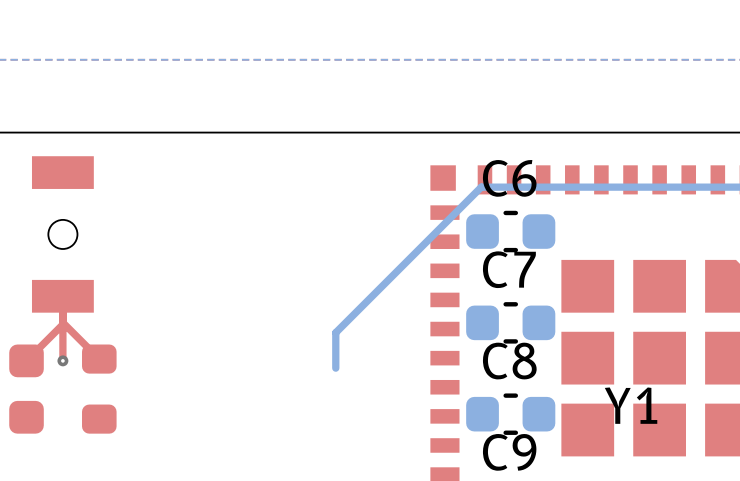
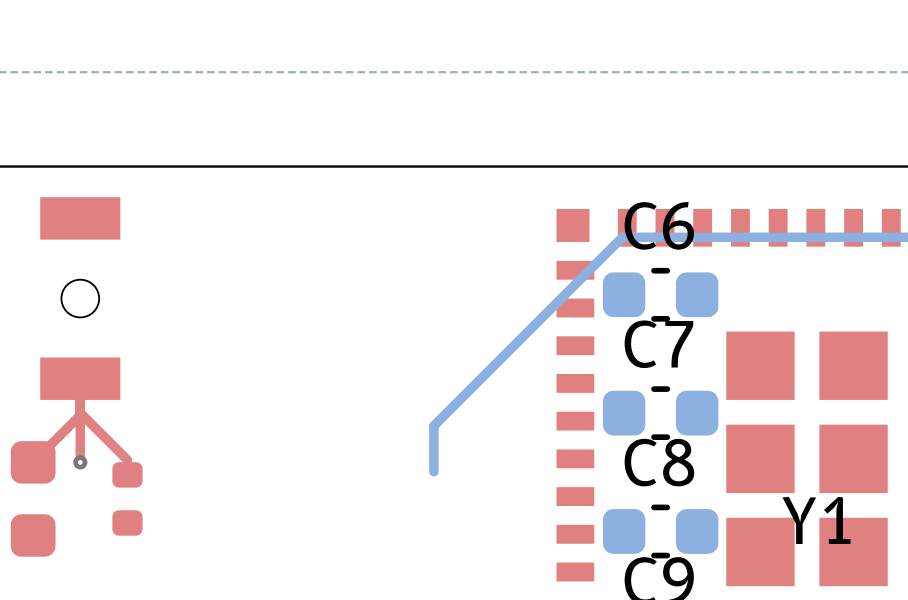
part footprint: [82, 344, 117, 434] -> [112, 462, 143, 536]

